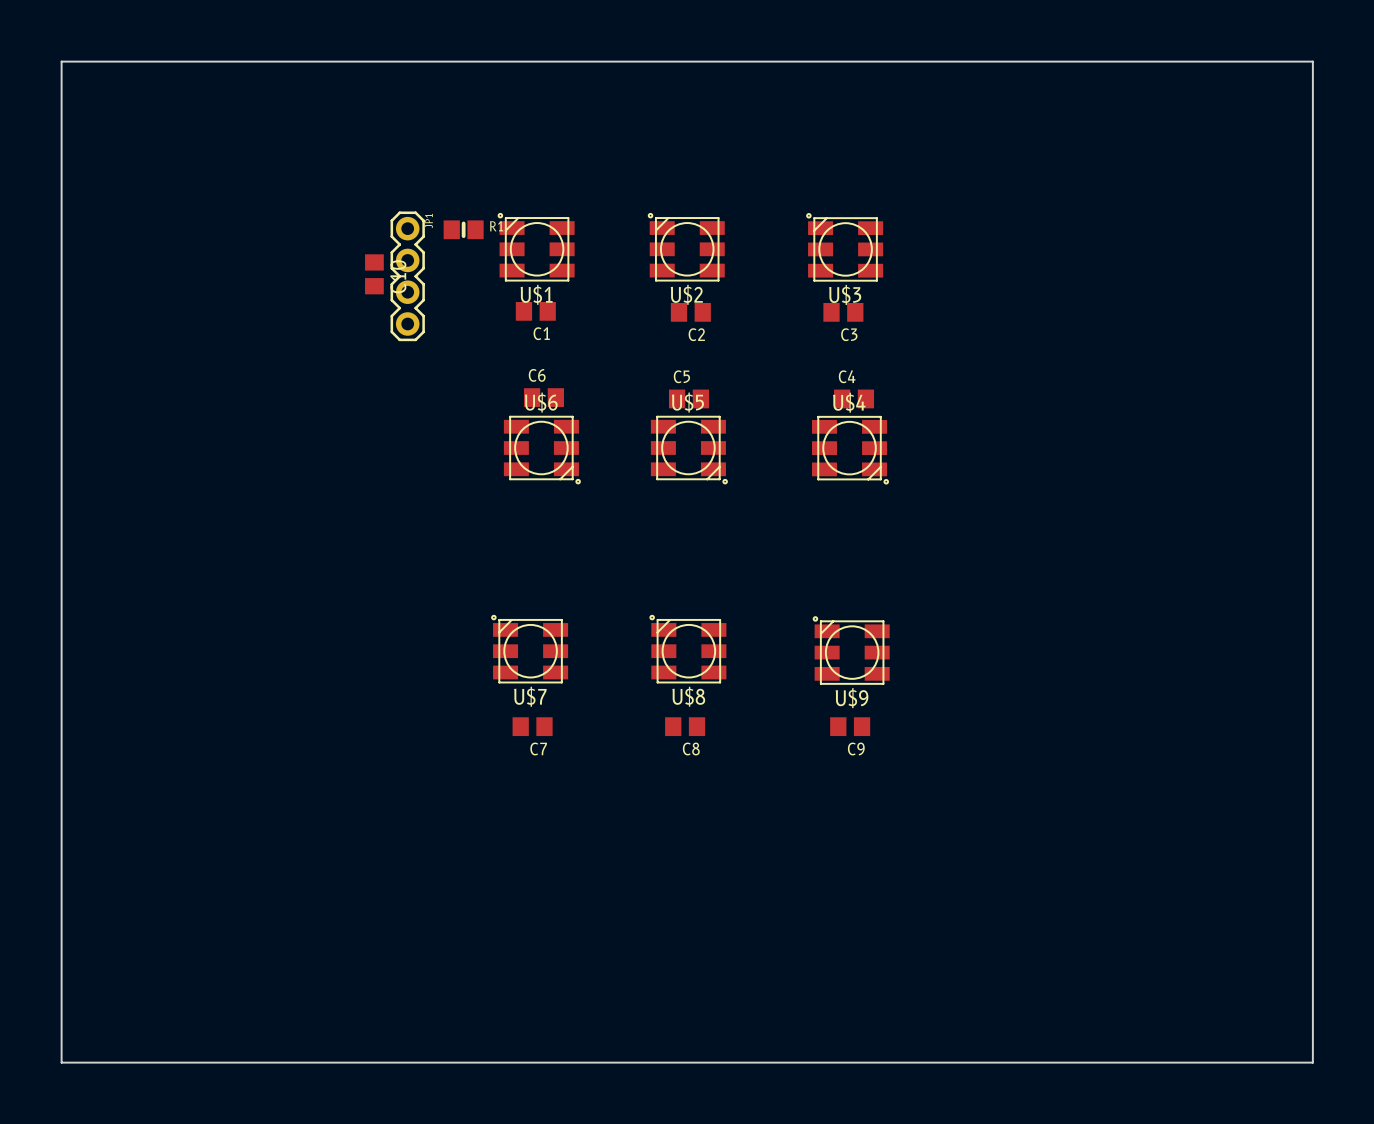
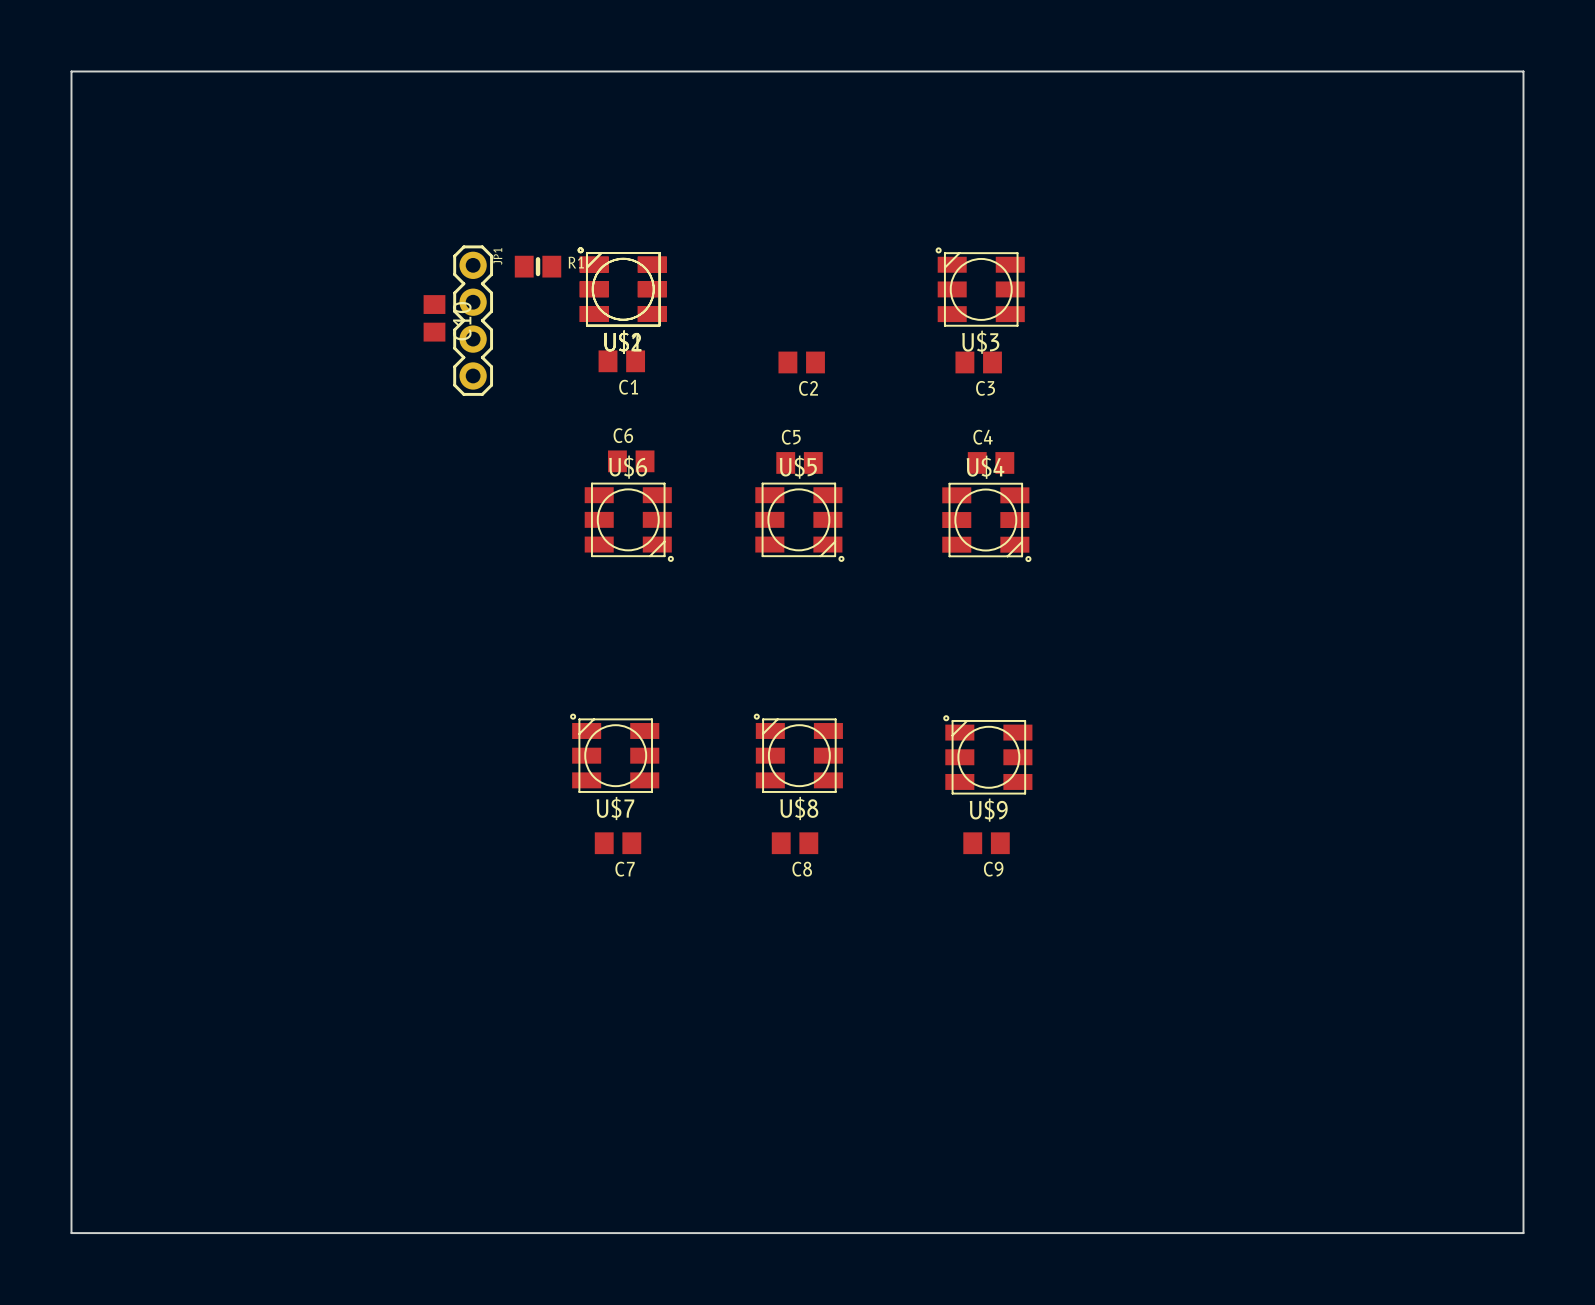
U$2 position: (686, 247) -> (622, 286)

